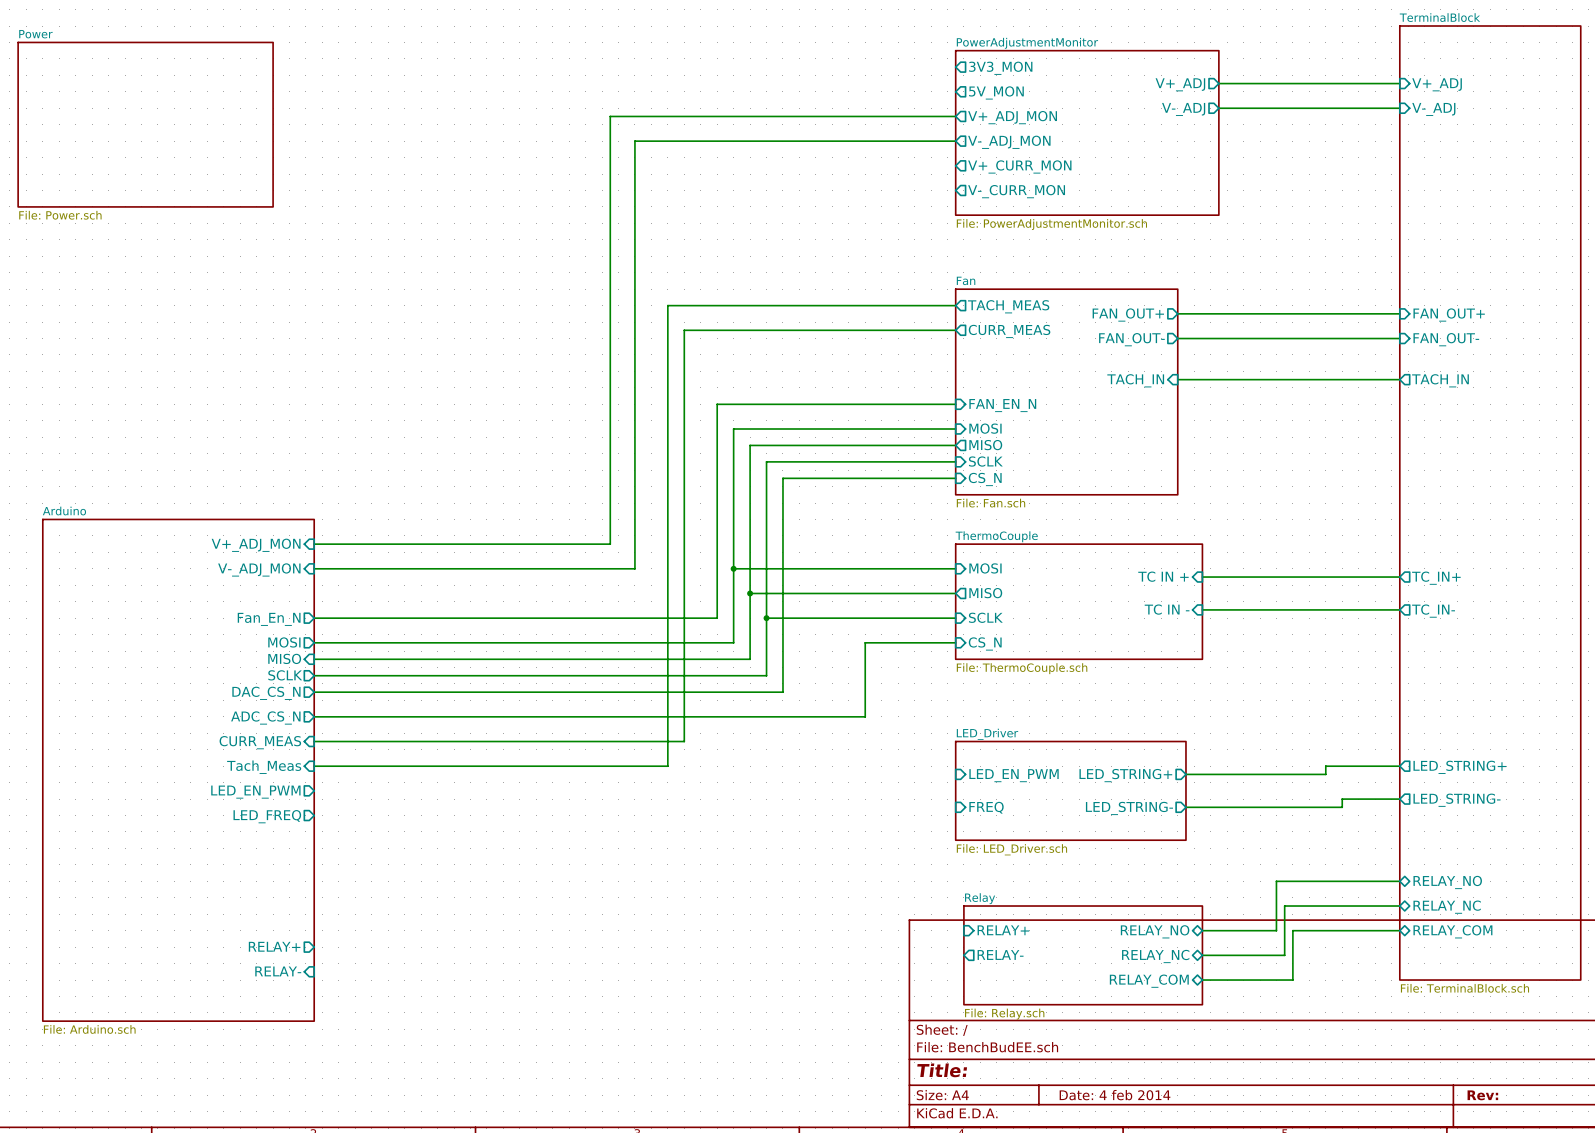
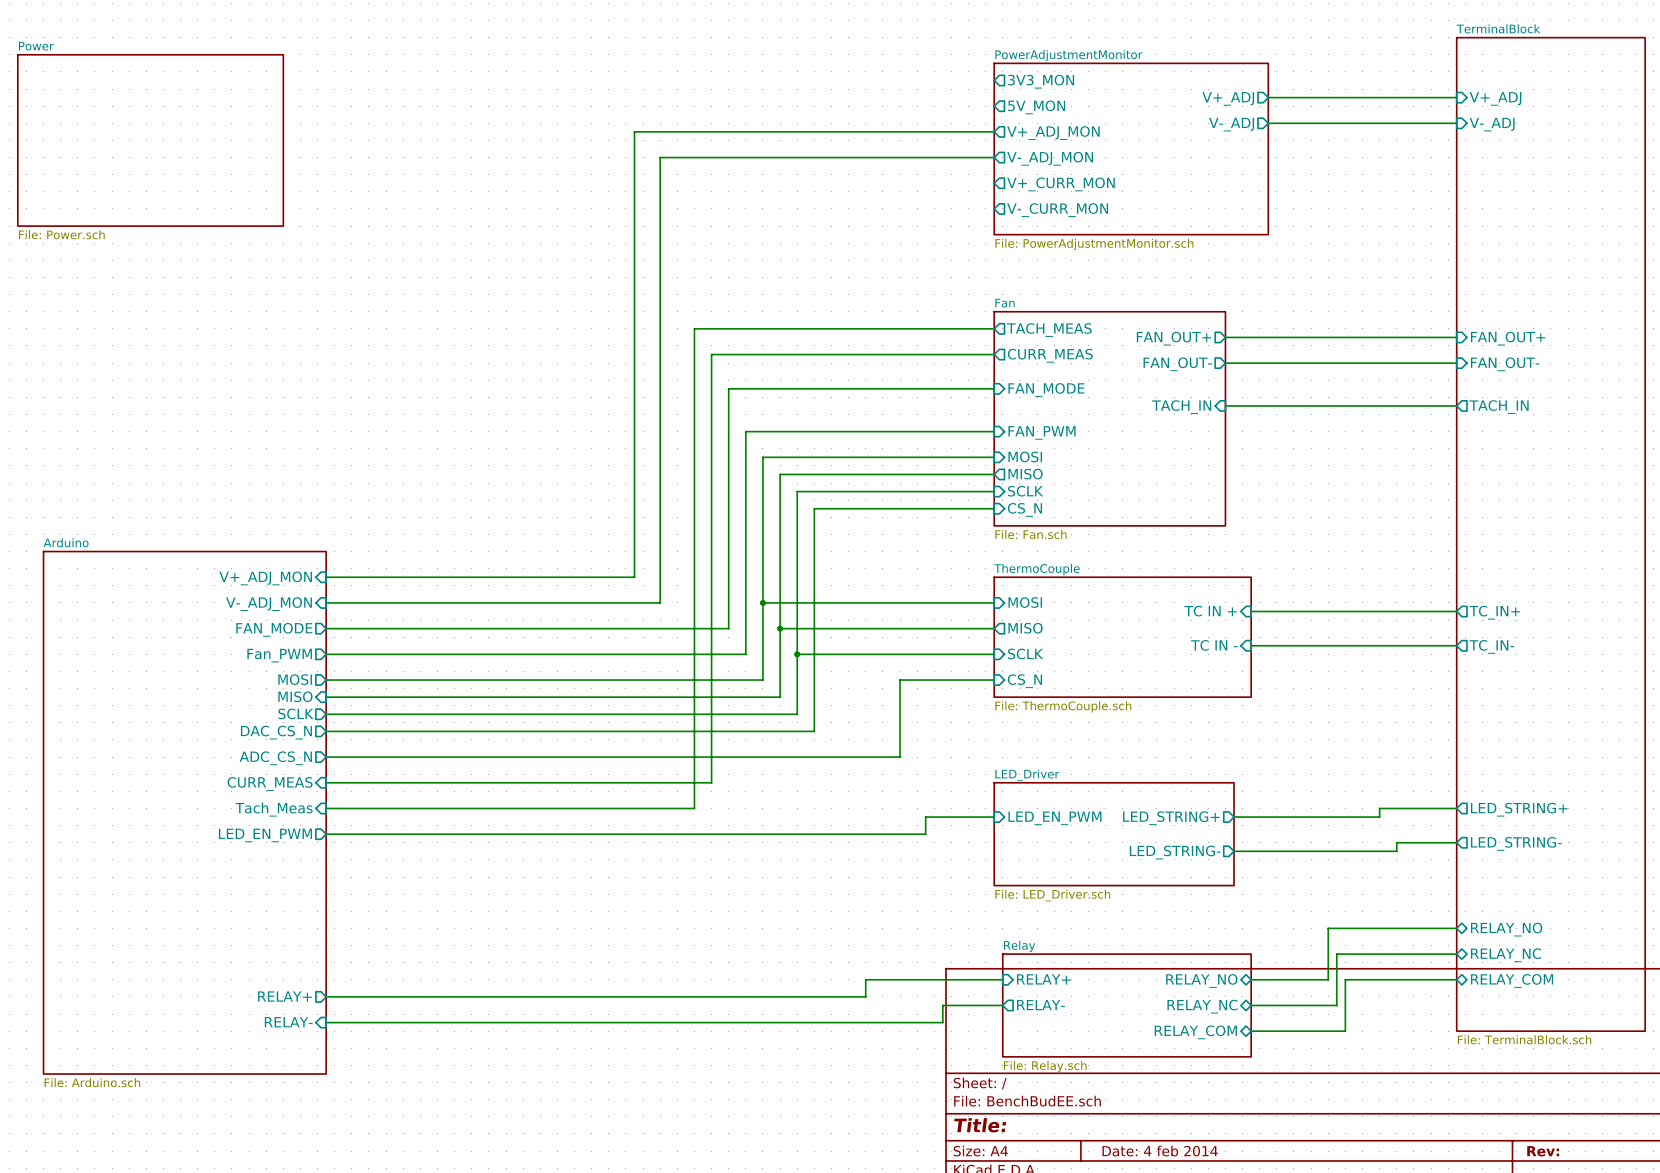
wire: none -> (994, 388) (728, 388) (728, 628) (326, 628)
sheet pin: none -> FAN_MODE (1046, 390)
sheet pin: FAN_EN_N (1002, 405) -> FAN_PWM (1042, 432)
sheet pin: none -> FAN_MODE (274, 629)
sheet pin: Fan_En_N (269, 619) -> Fan_PWM (279, 655)
wire: none -> (994, 817) (925, 817) (925, 834) (326, 834)
sheet pin: FREQ (986, 807) -> none
sheet pin: LED_FREQ (267, 816) -> none
wire: none -> (1002, 979) (865, 979) (865, 996) (326, 996)
wire: none -> (1002, 1005) (942, 1005) (942, 1022) (326, 1022)

